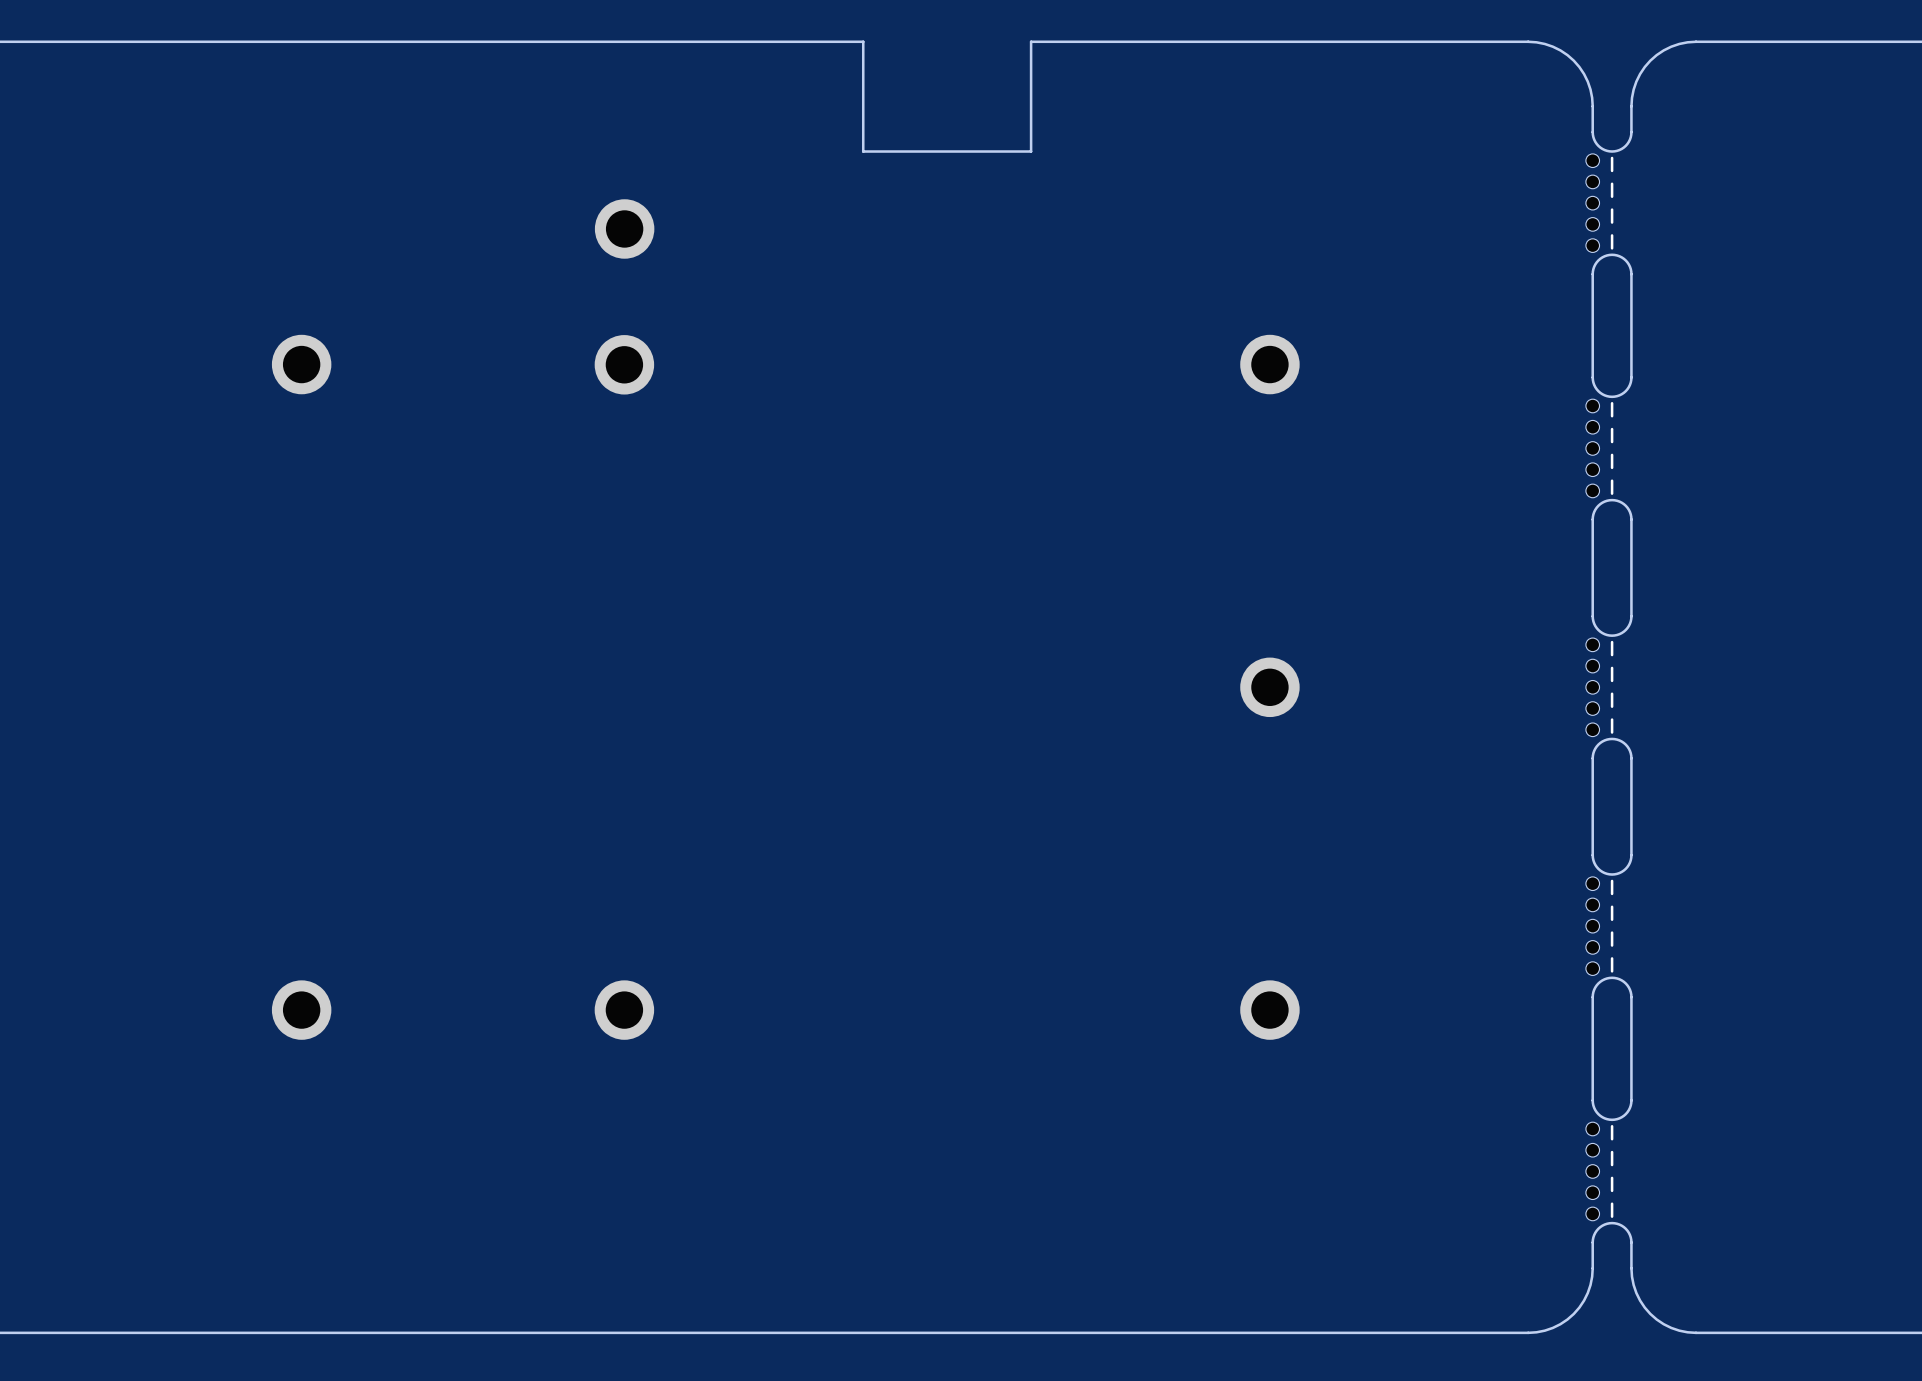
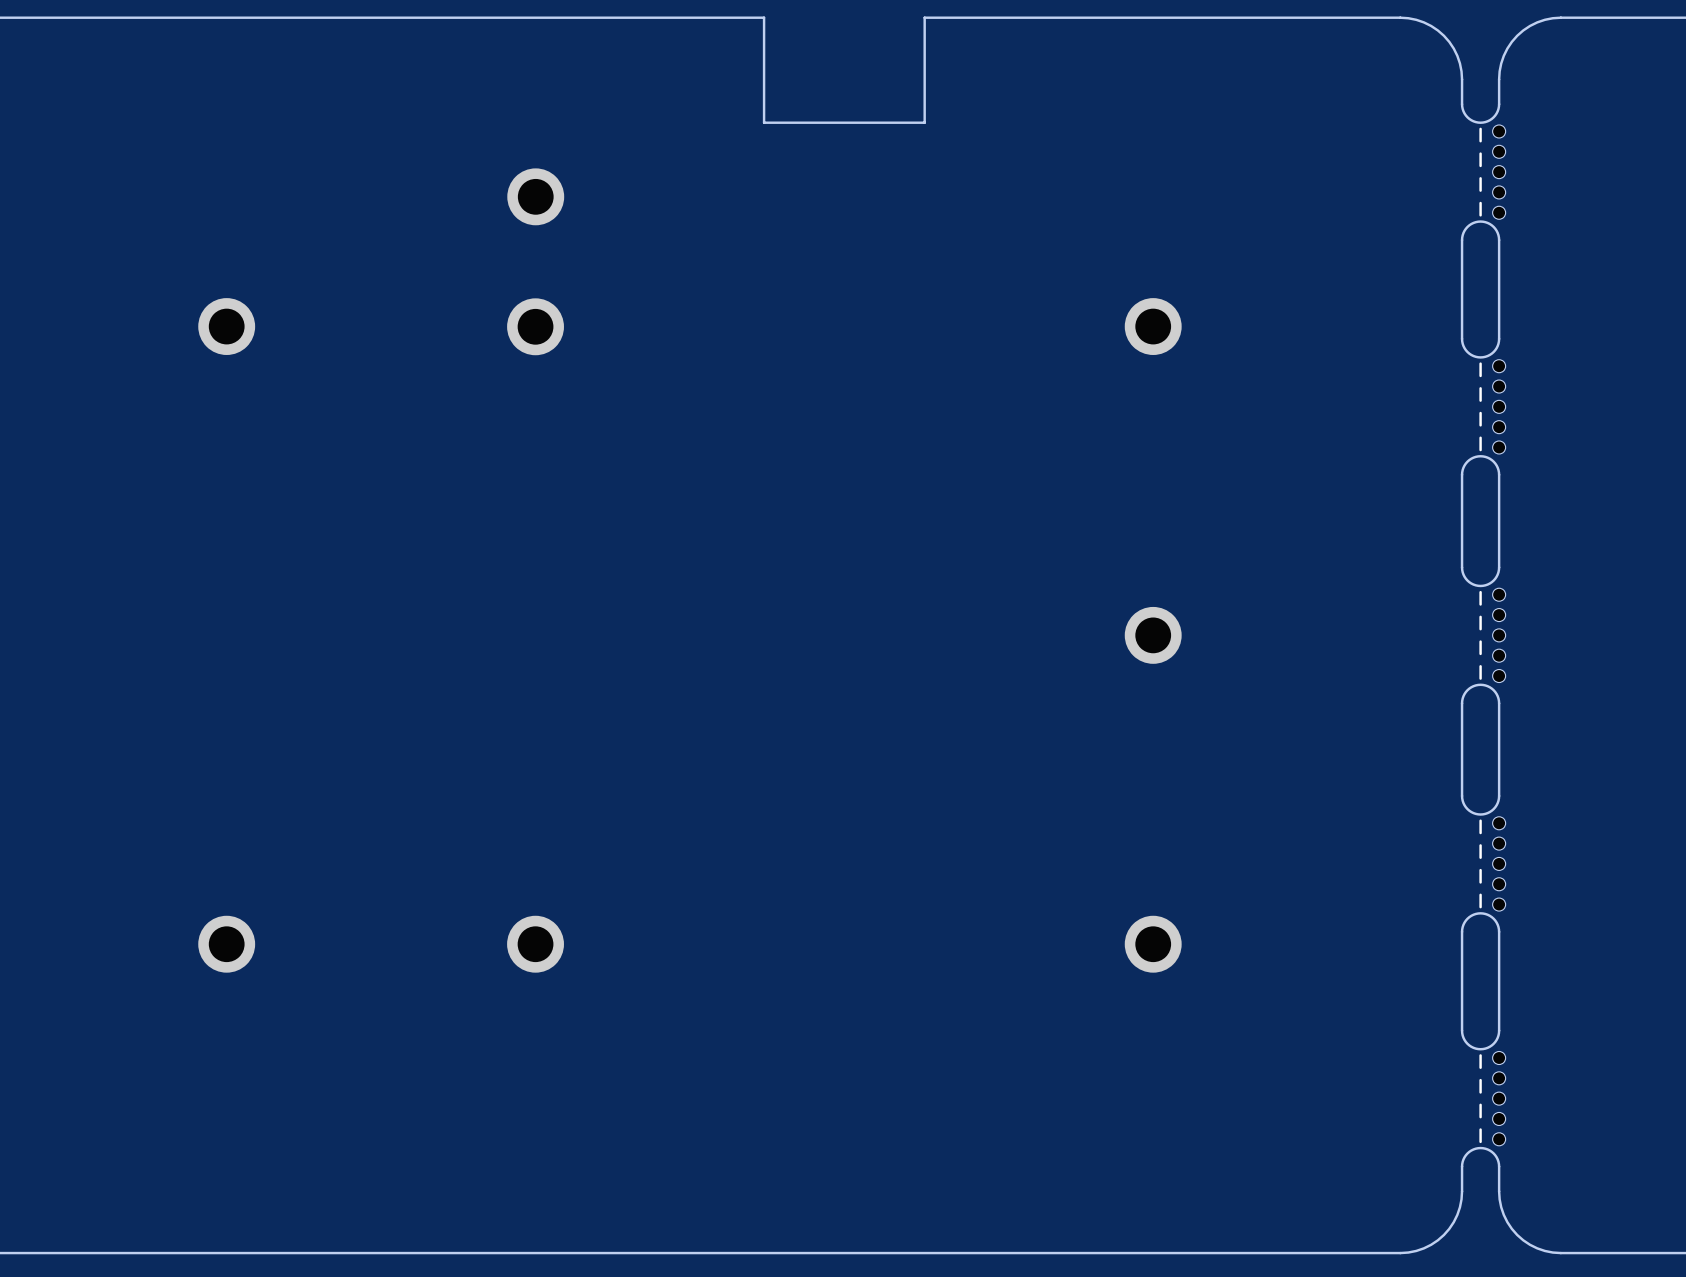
part position: (1592, 203) -> (1499, 172)
part position: (1592, 448) -> (1499, 406)
part position: (1592, 687) -> (1499, 635)
part position: (1592, 926) -> (1499, 863)
part position: (1592, 1171) -> (1499, 1098)

